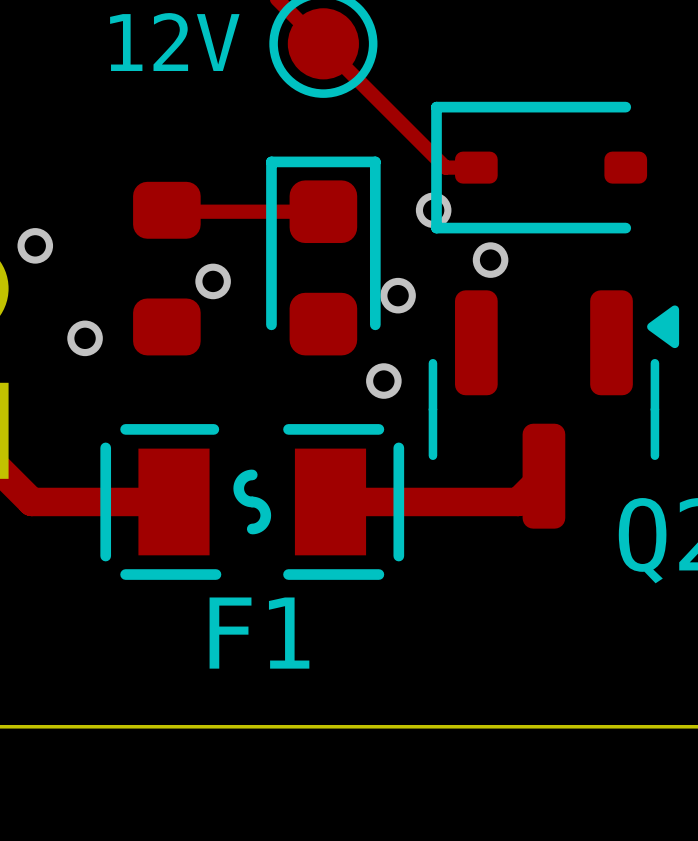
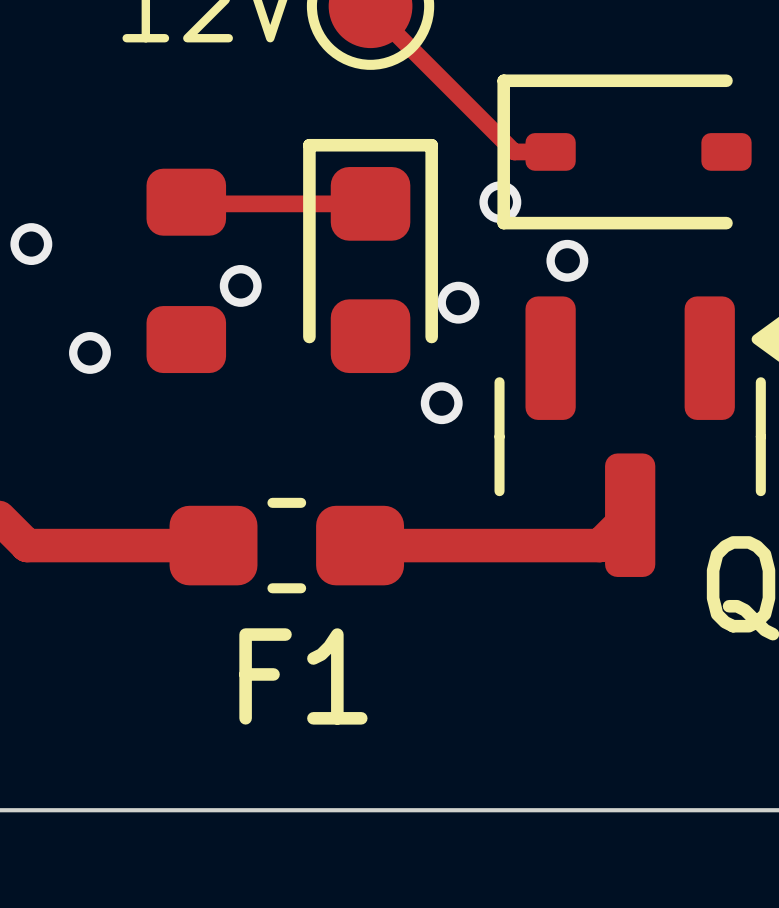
F1 footprint: [100, 424, 405, 580] -> [169, 497, 405, 594]

